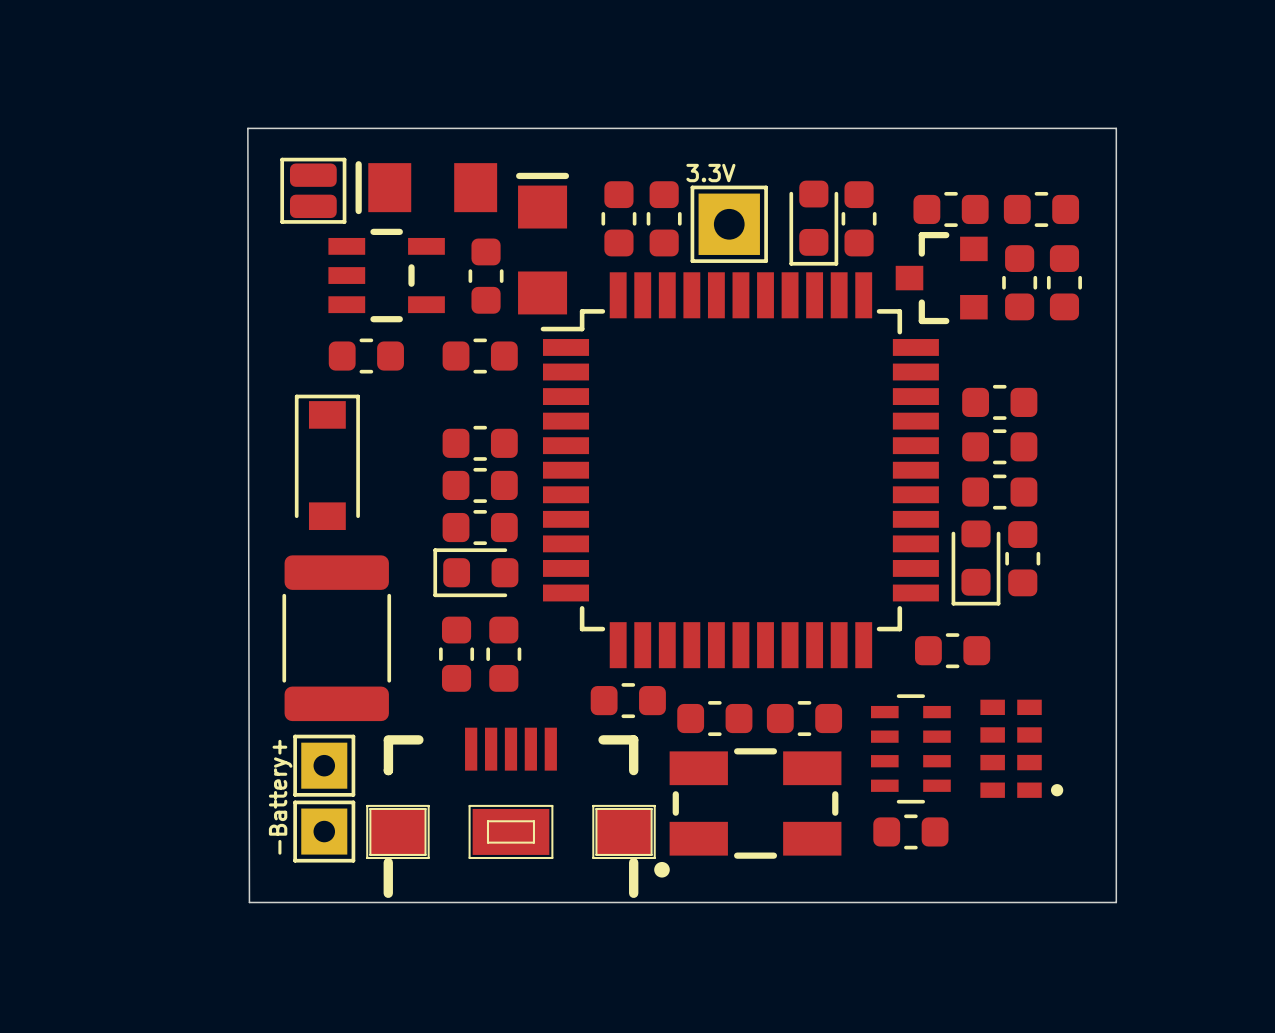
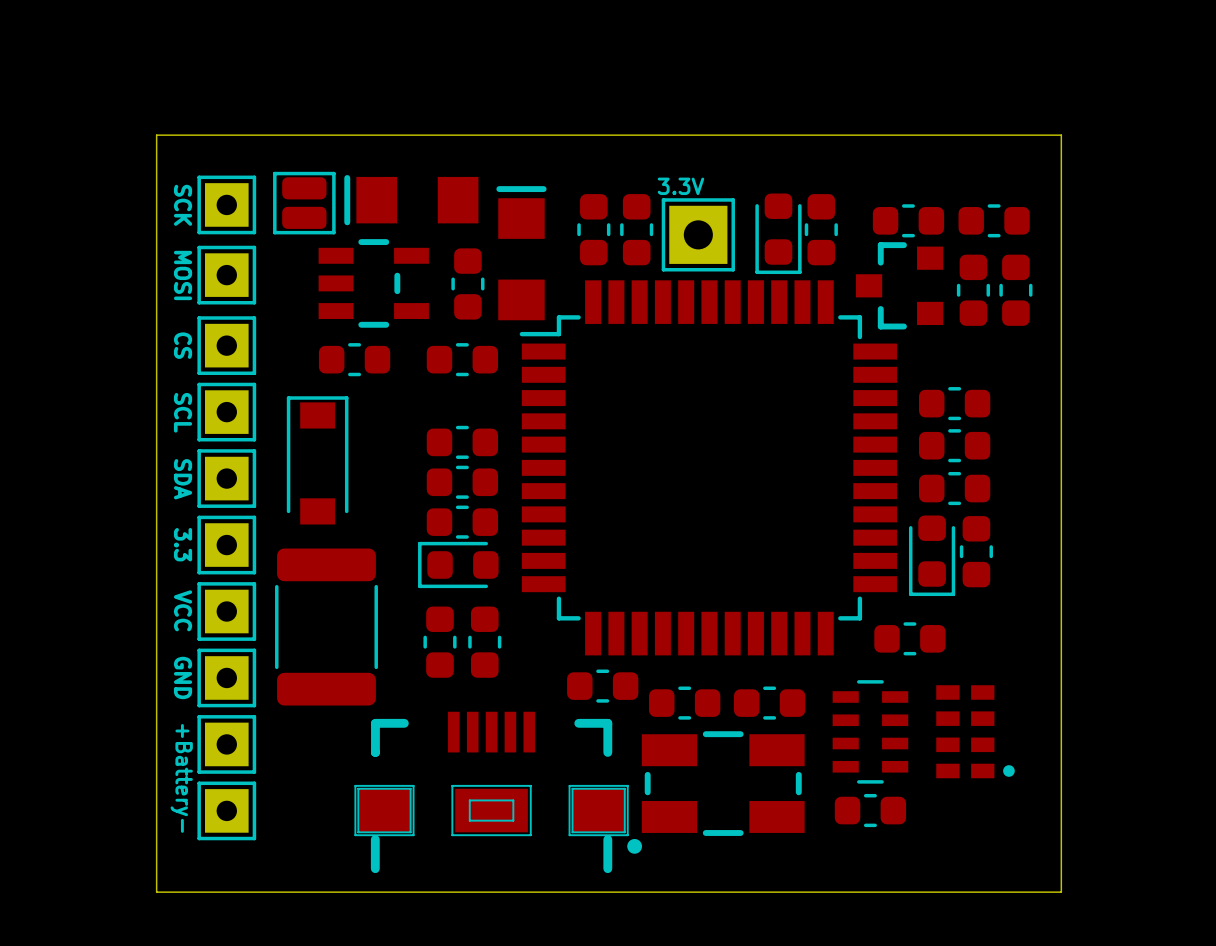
board edge: (247, 128) (1116, 128) (1116, 902) (249, 902) (247, 128) -> (156, 135) (156, 892) (1061, 892) (1061, 135) (156, 135)
SCK: none -> (226, 204)
MOSI: none -> (226, 275)
CS: none -> (226, 345)
SCL: none -> (226, 412)
SDA: none -> (226, 478)
3.3: none -> (226, 545)
VCC: none -> (226, 611)
GND: none -> (226, 677)
part position: (324, 765) -> (226, 744)
-Battery+: (324, 831) -> none
+Battery-: none -> (226, 810)

